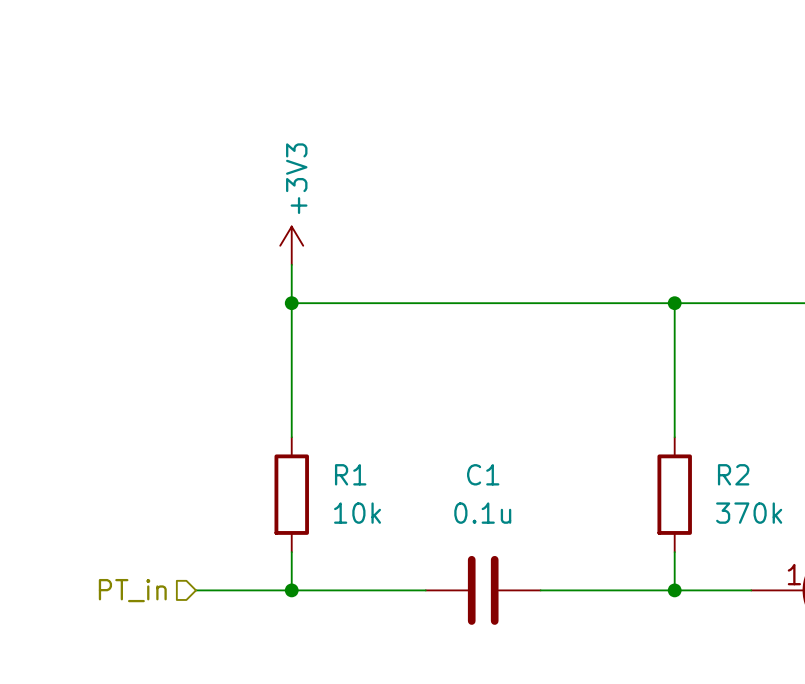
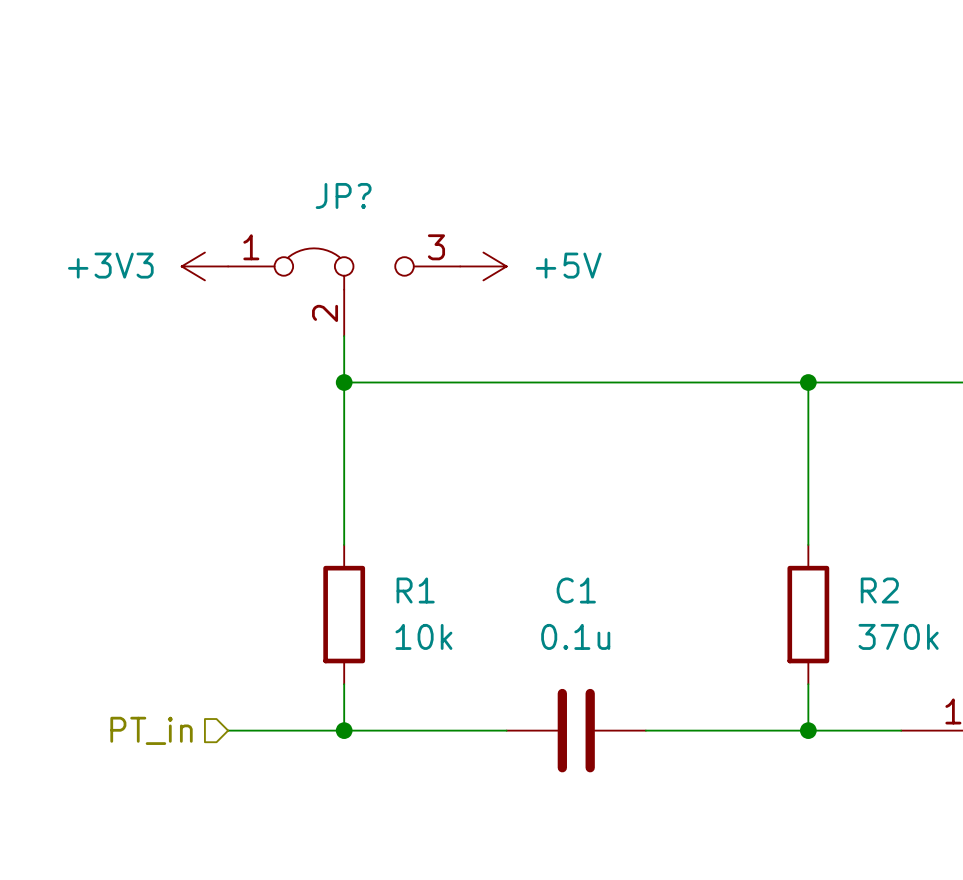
power symbol: none -> +5V (483, 266)
JP?: none -> (344, 292)
power symbol rotation: 0° (291, 245) -> 90° counterclockwise (204, 266)
power symbol position: +3V3 (291, 245) -> +3V3 (204, 266)

